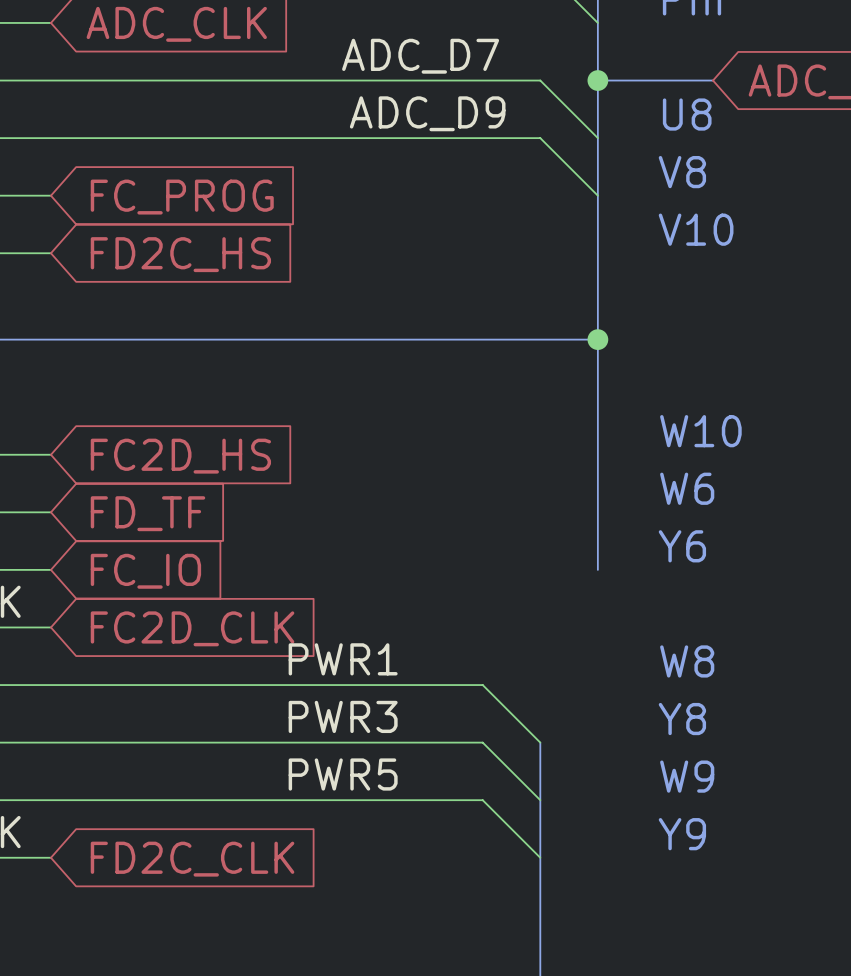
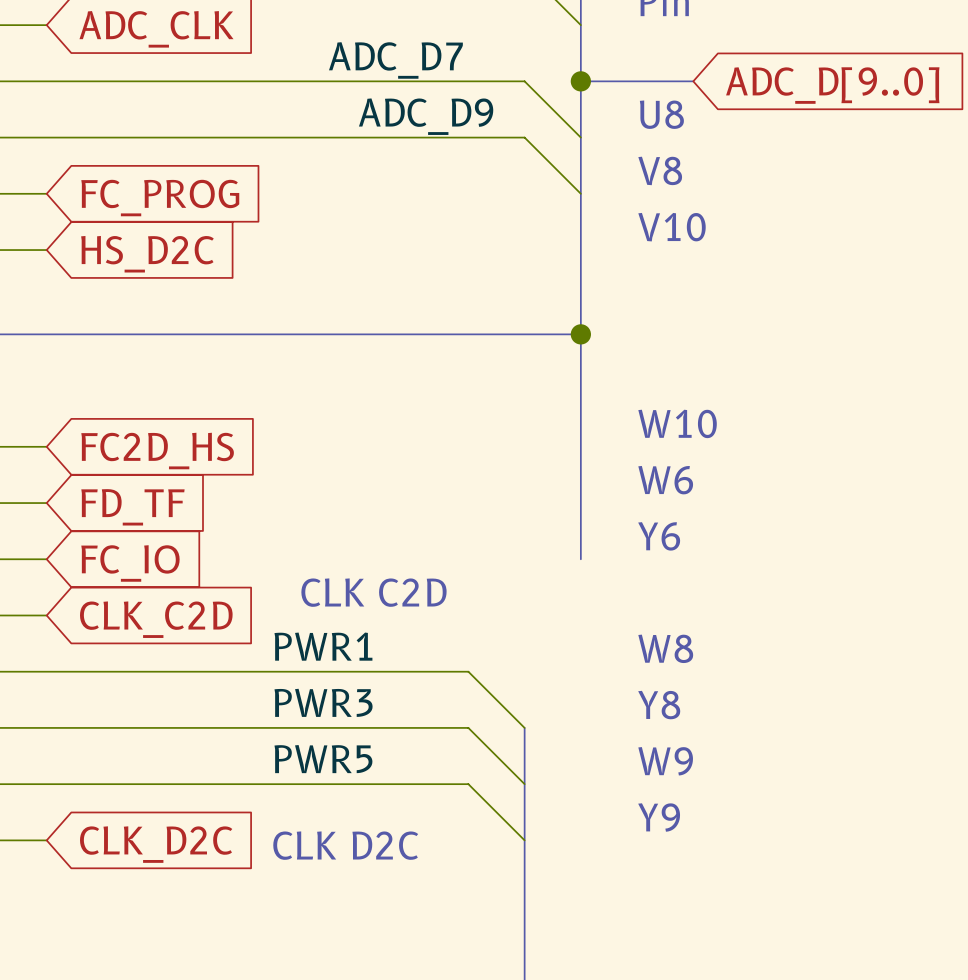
global label: FD2C_HS (180, 254) -> HS_D2C (147, 254)
text: none -> CLK C2D (373, 592)
global label: FC2D_CLK (192, 628) -> CLK_C2D (156, 619)
global label: FD2C_CLK (192, 859) -> CLK_D2C (156, 844)
text: none -> CLK D2C (345, 845)

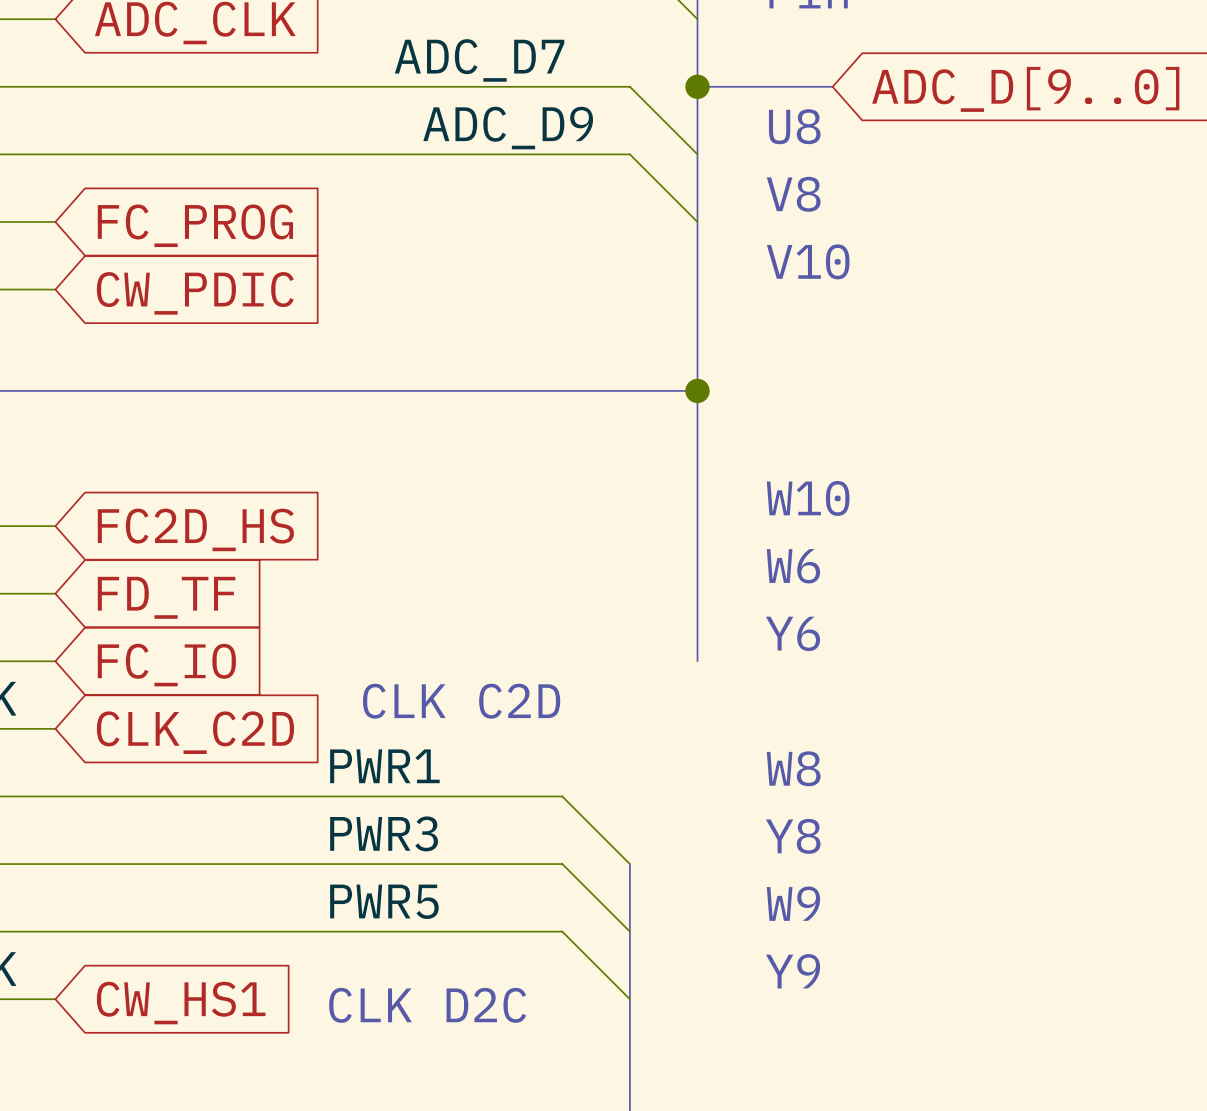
global label: HS_D2C (147, 254) -> CW_PDIC (195, 293)
global label: CLK_D2C (156, 844) -> CW_HS1 (181, 1003)

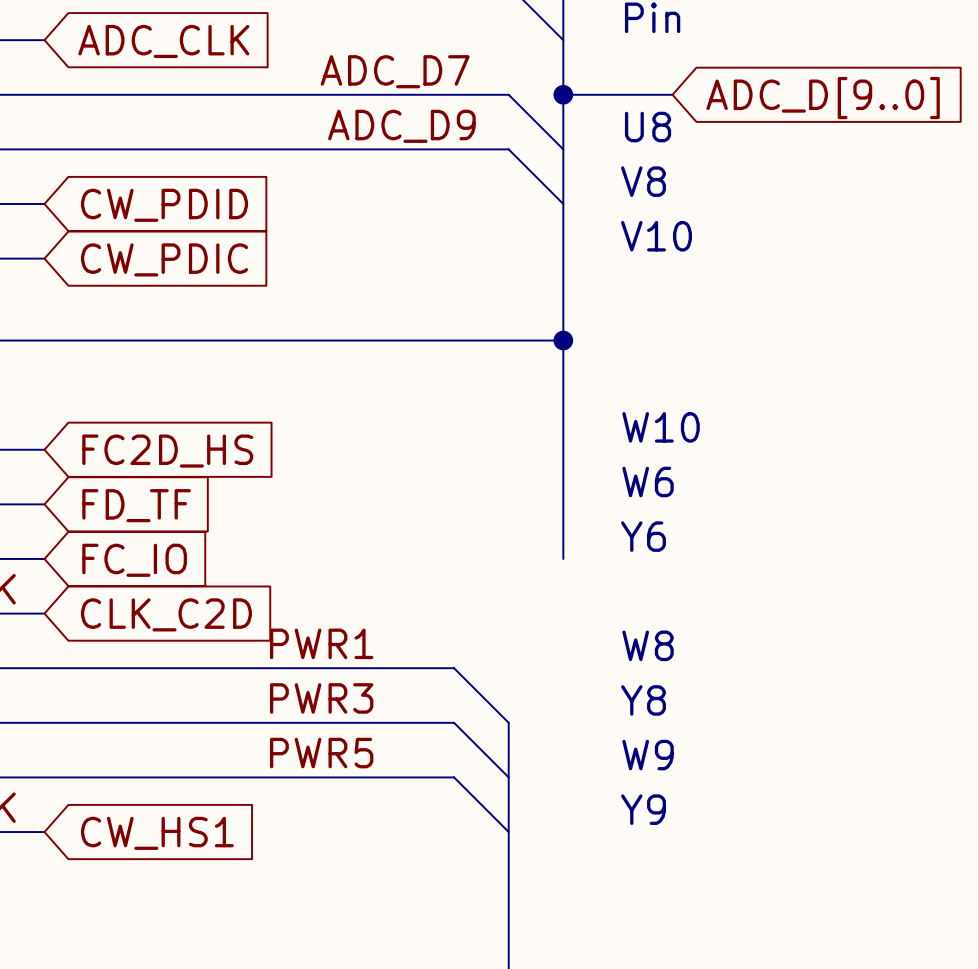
global label: FC_PROG (195, 225) -> CW_PDID (164, 205)
text: CLK C2D (461, 701) -> none
text: CLK D2C (427, 1005) -> none

